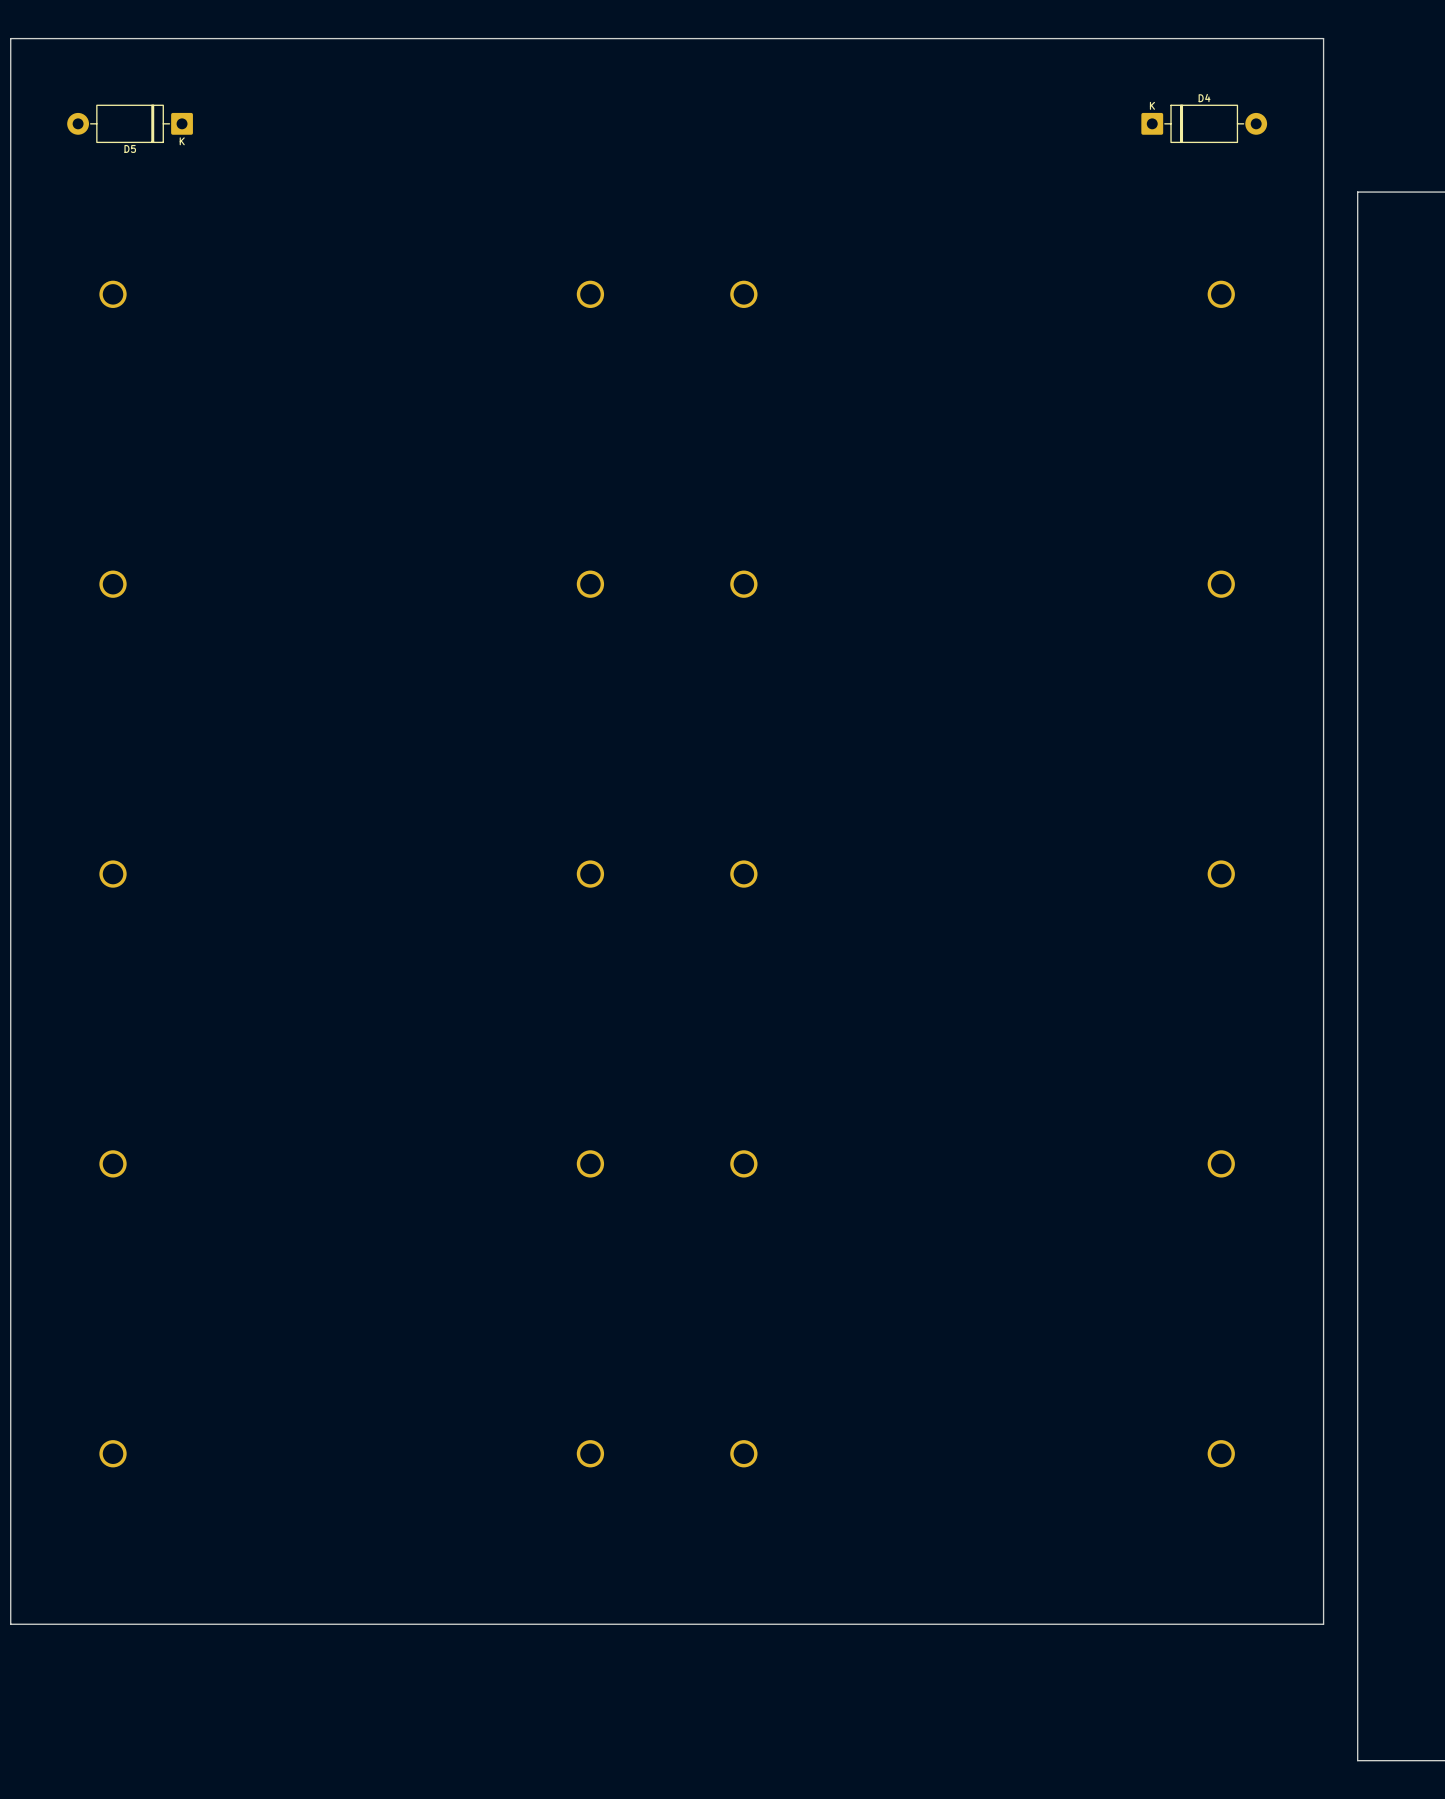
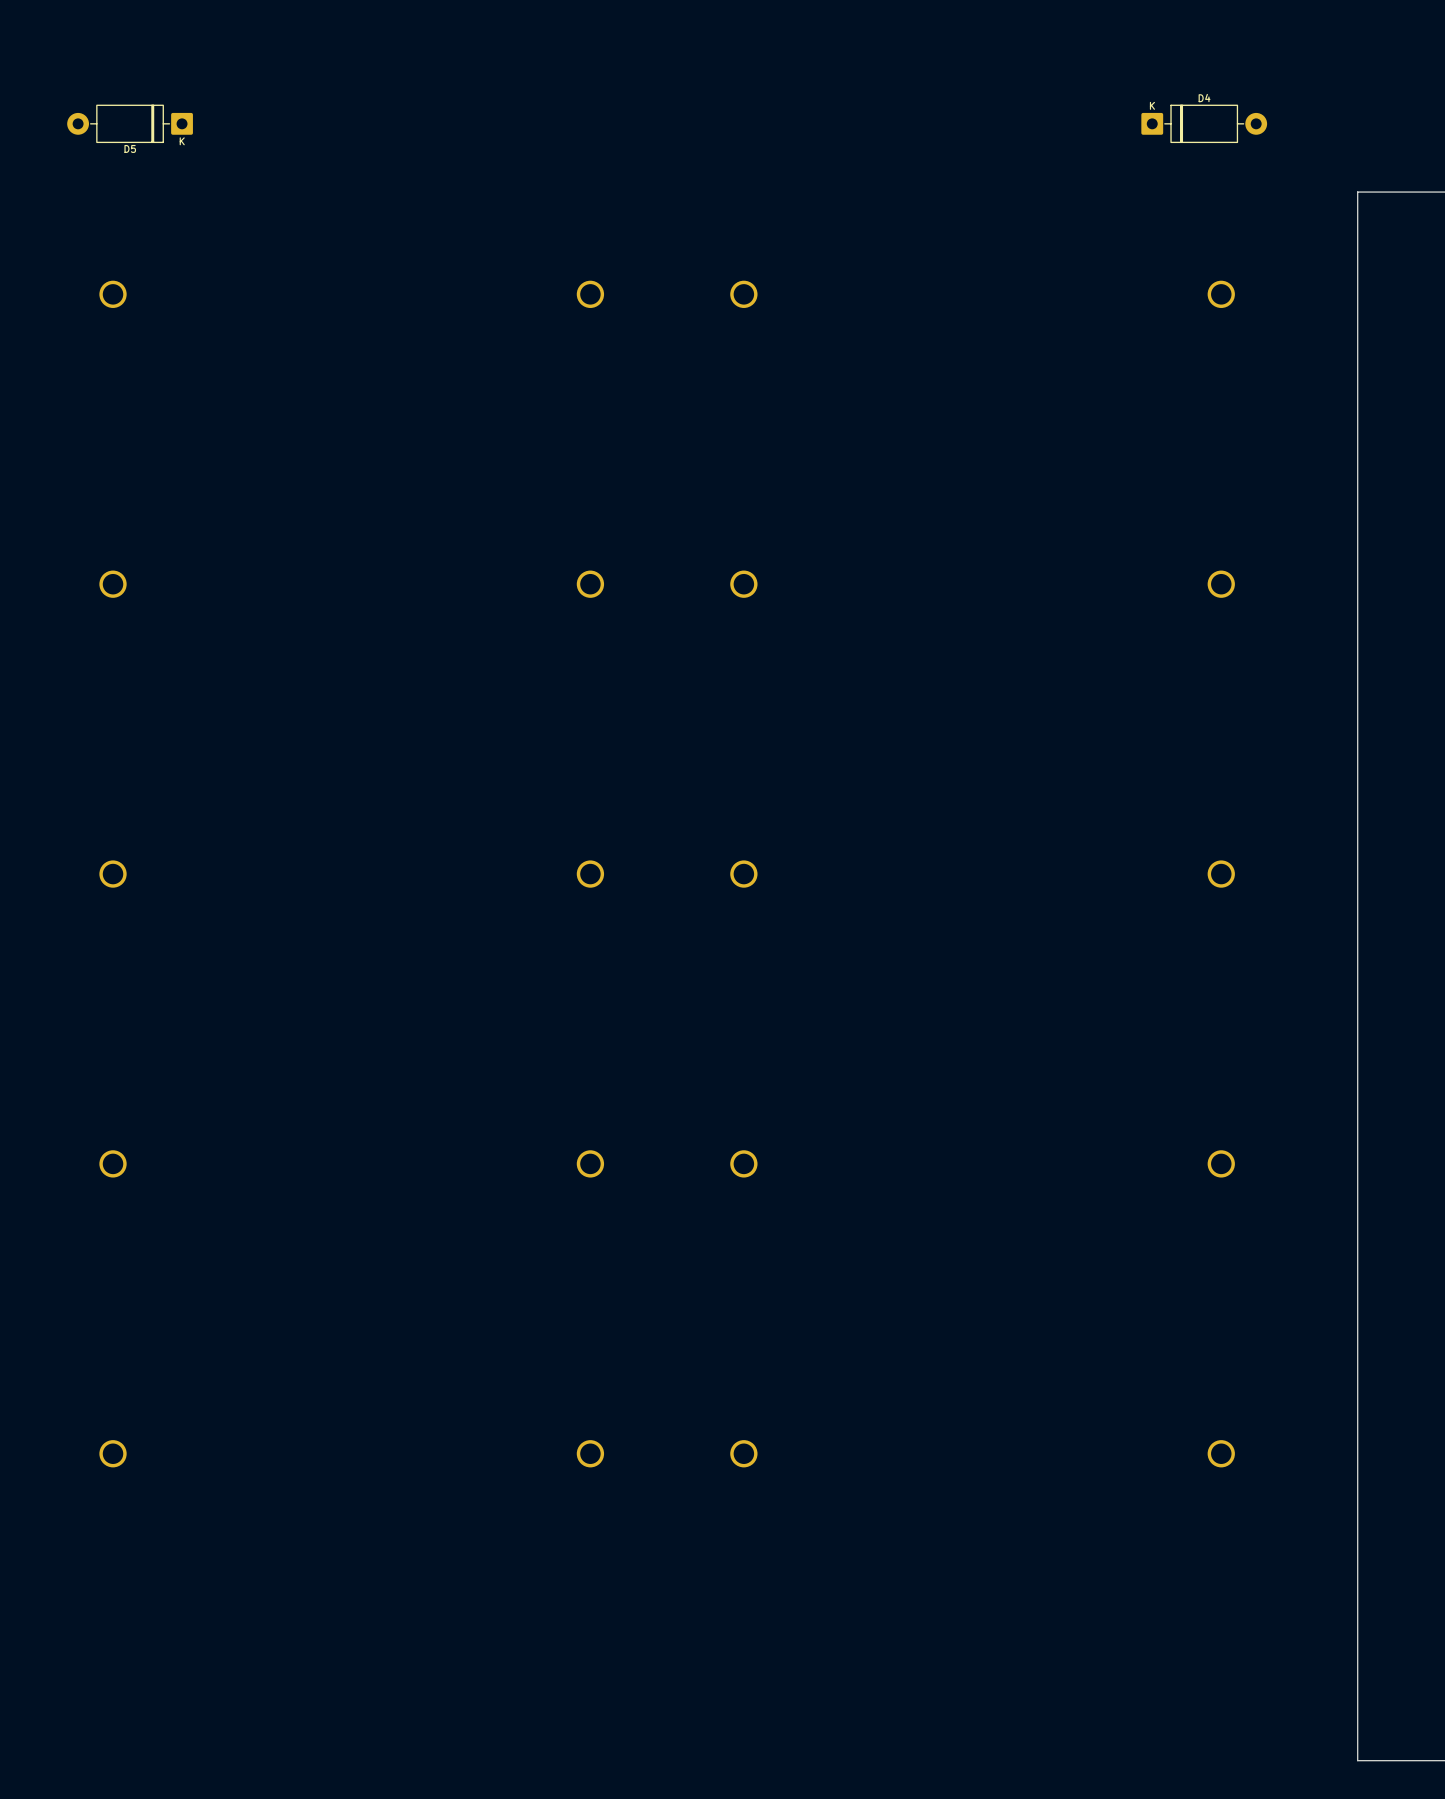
board edge: (1323, 38) (10, 38) (10, 1624) (1323, 1624) (1323, 38) -> none

